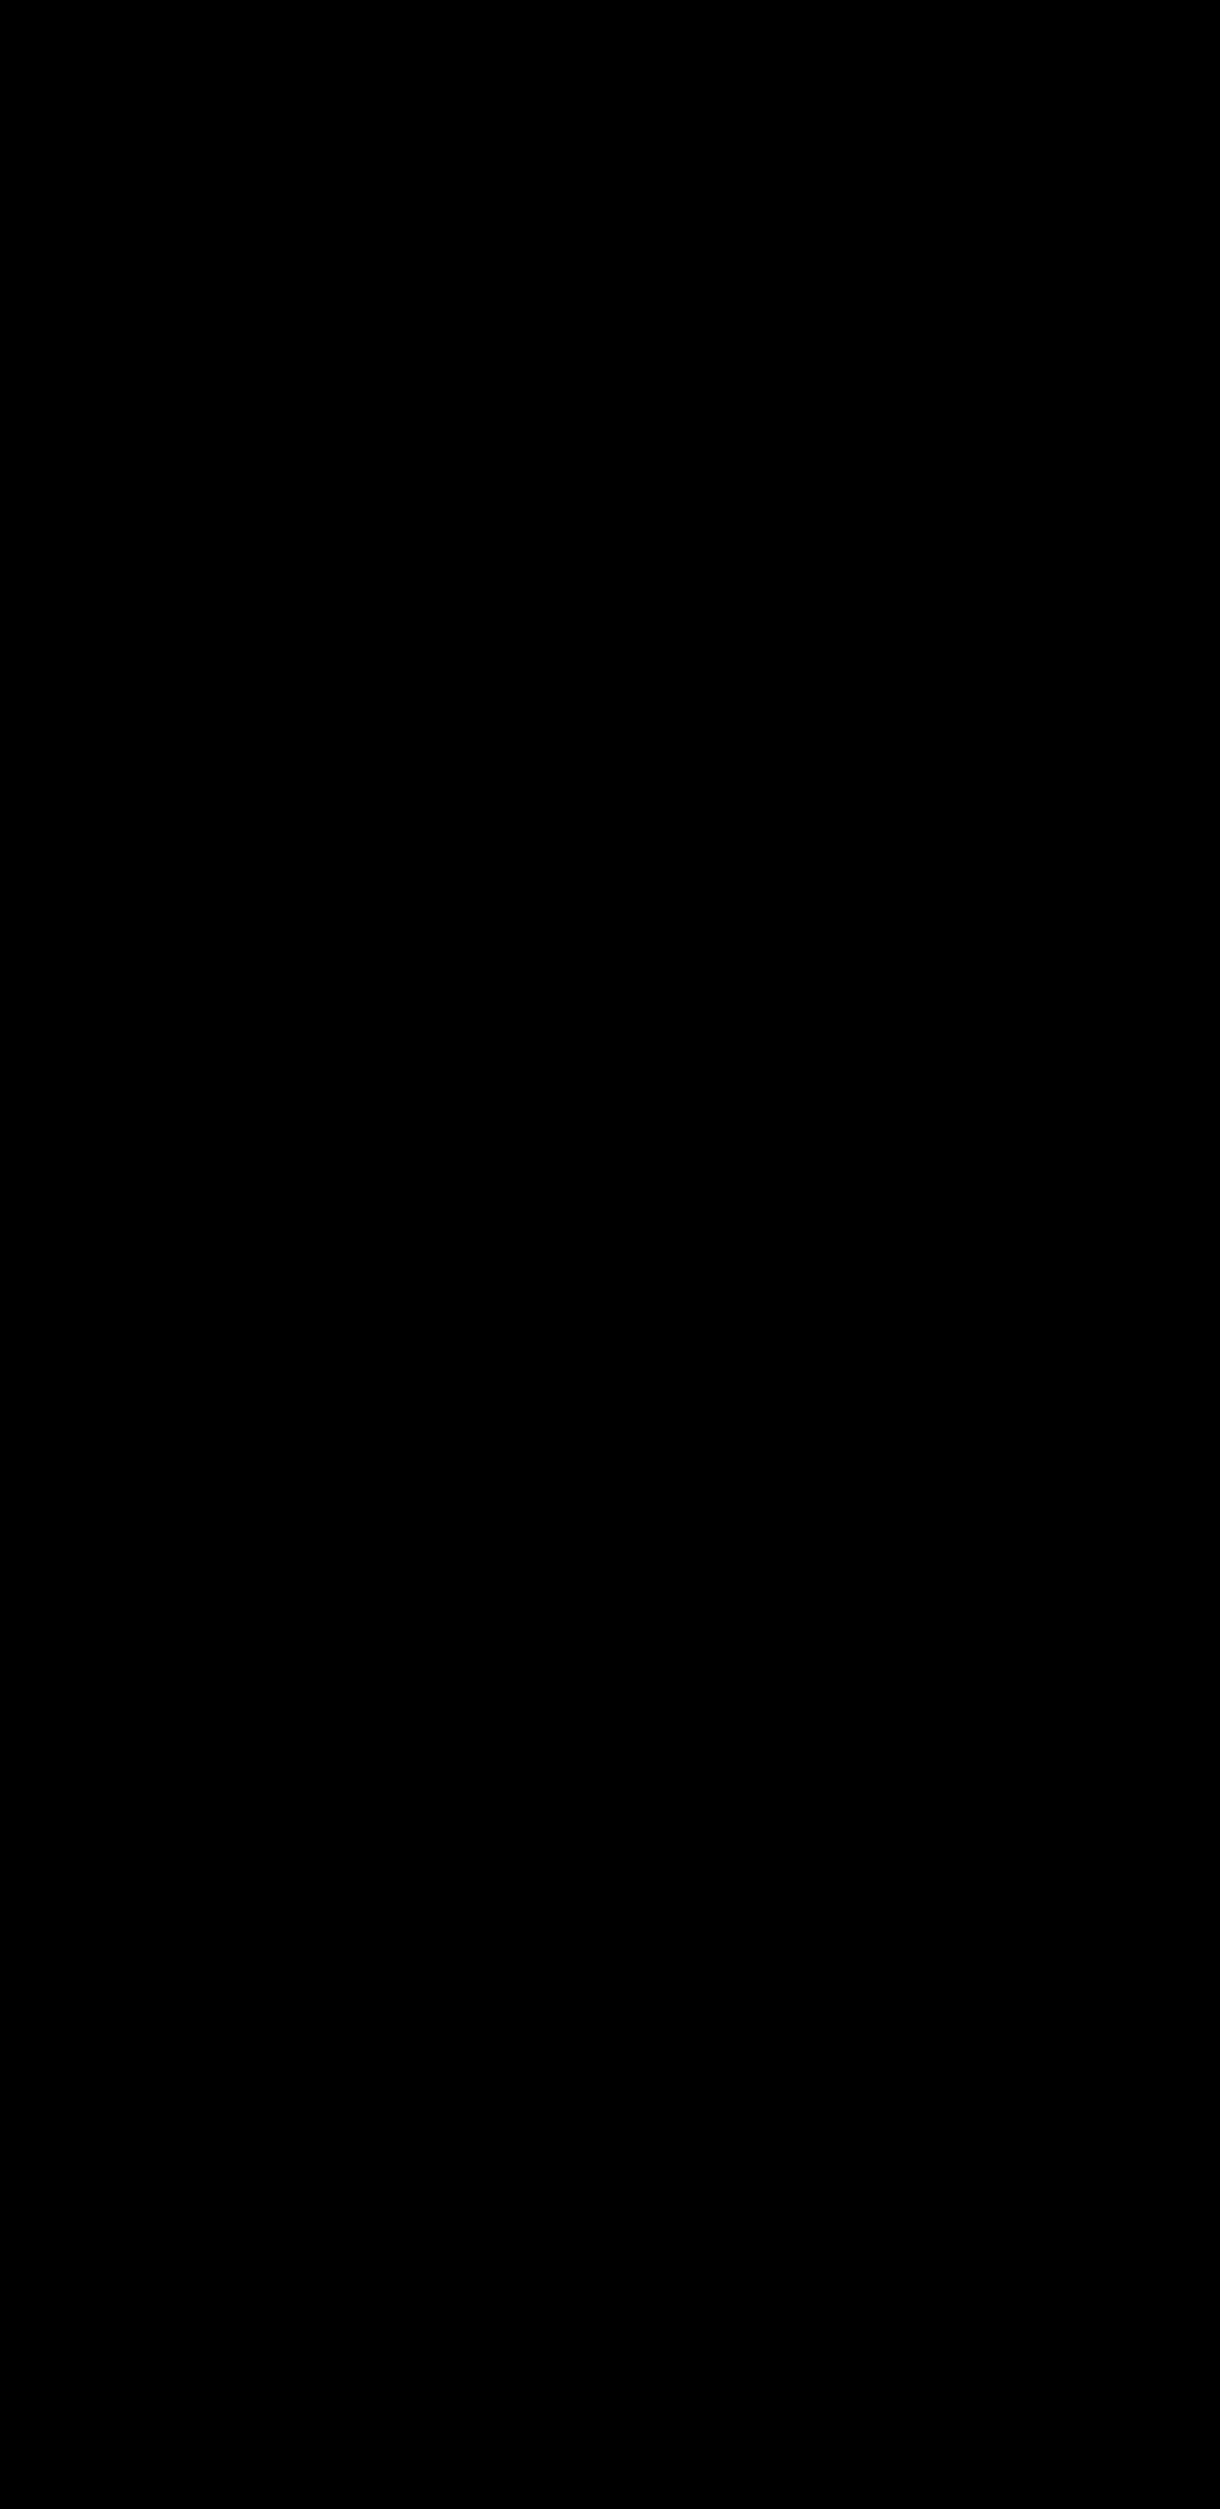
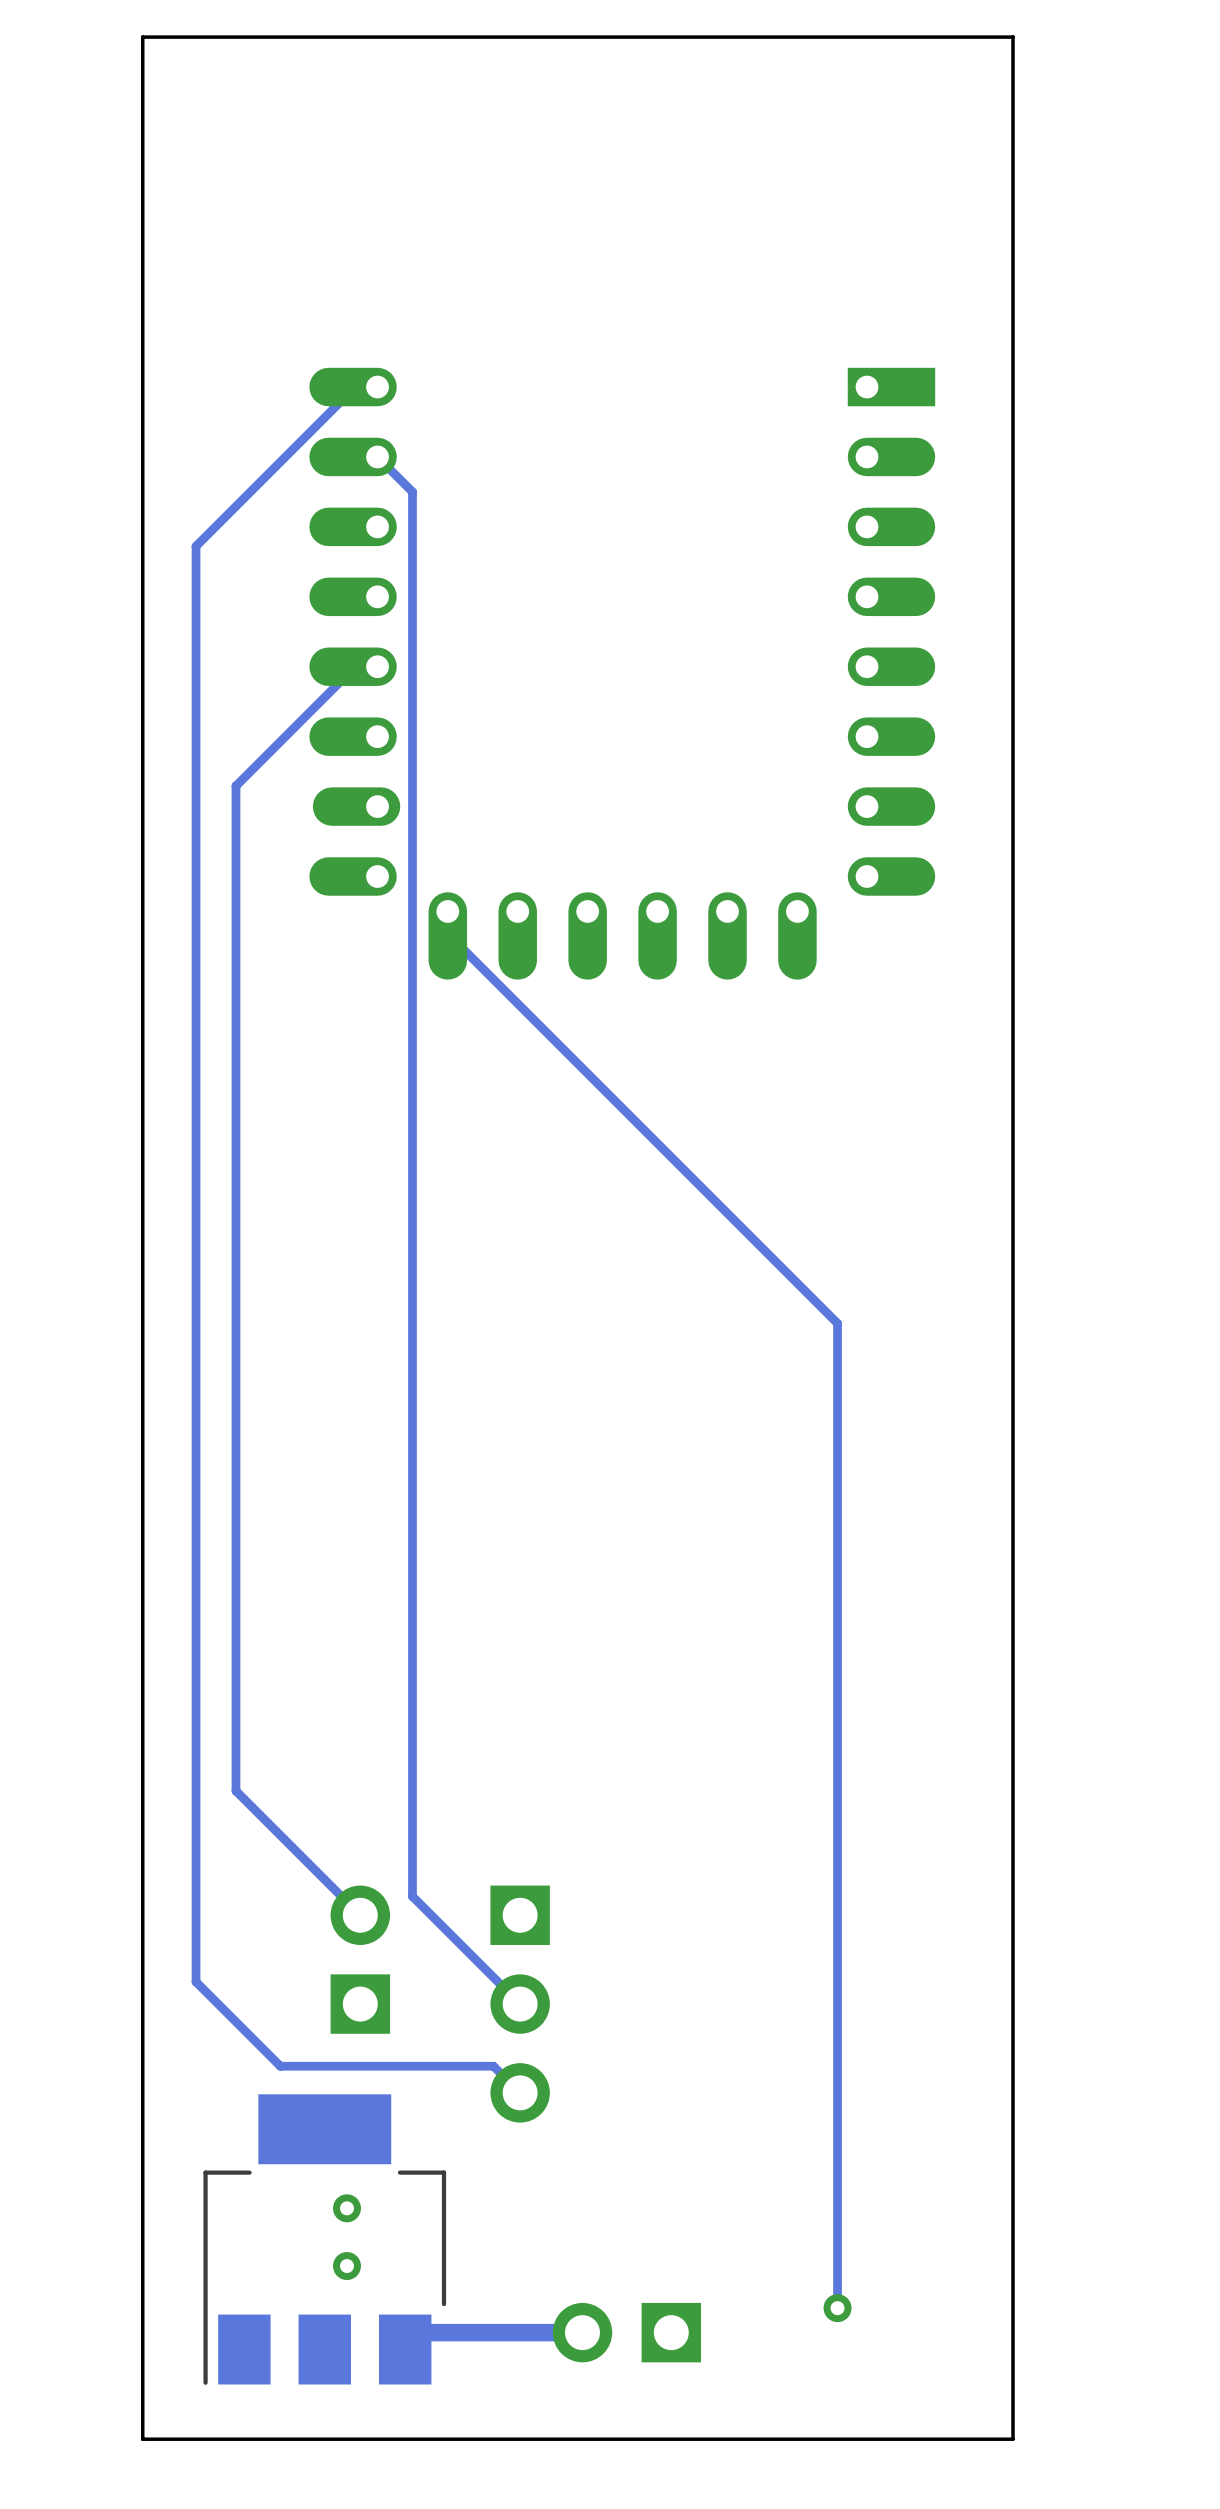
board edge: none -> (1013, 37) (142, 37) (142, 2439) (1013, 2439) (1013, 37)
track: none -> (377, 387) (355, 387) (196, 546) (196, 1981) (280, 2066) (493, 2066) (520, 2092)
track: none -> (377, 456) (412, 491) (412, 1896) (520, 2004)
track: none -> (377, 666) (355, 666) (235, 786) (235, 1790) (360, 1915)
part: none -> (622, 673)
track: none -> (447, 911) (447, 933) (837, 1323) (837, 2308)
part: none -> (360, 1959)
part: none -> (520, 2004)
via: none -> (346, 2208)
part: none -> (324, 2239)
via: none -> (346, 2266)
via: none -> (837, 2308)
track: none -> (582, 2332) (422, 2332) (405, 2349)
part: none -> (626, 2332)

